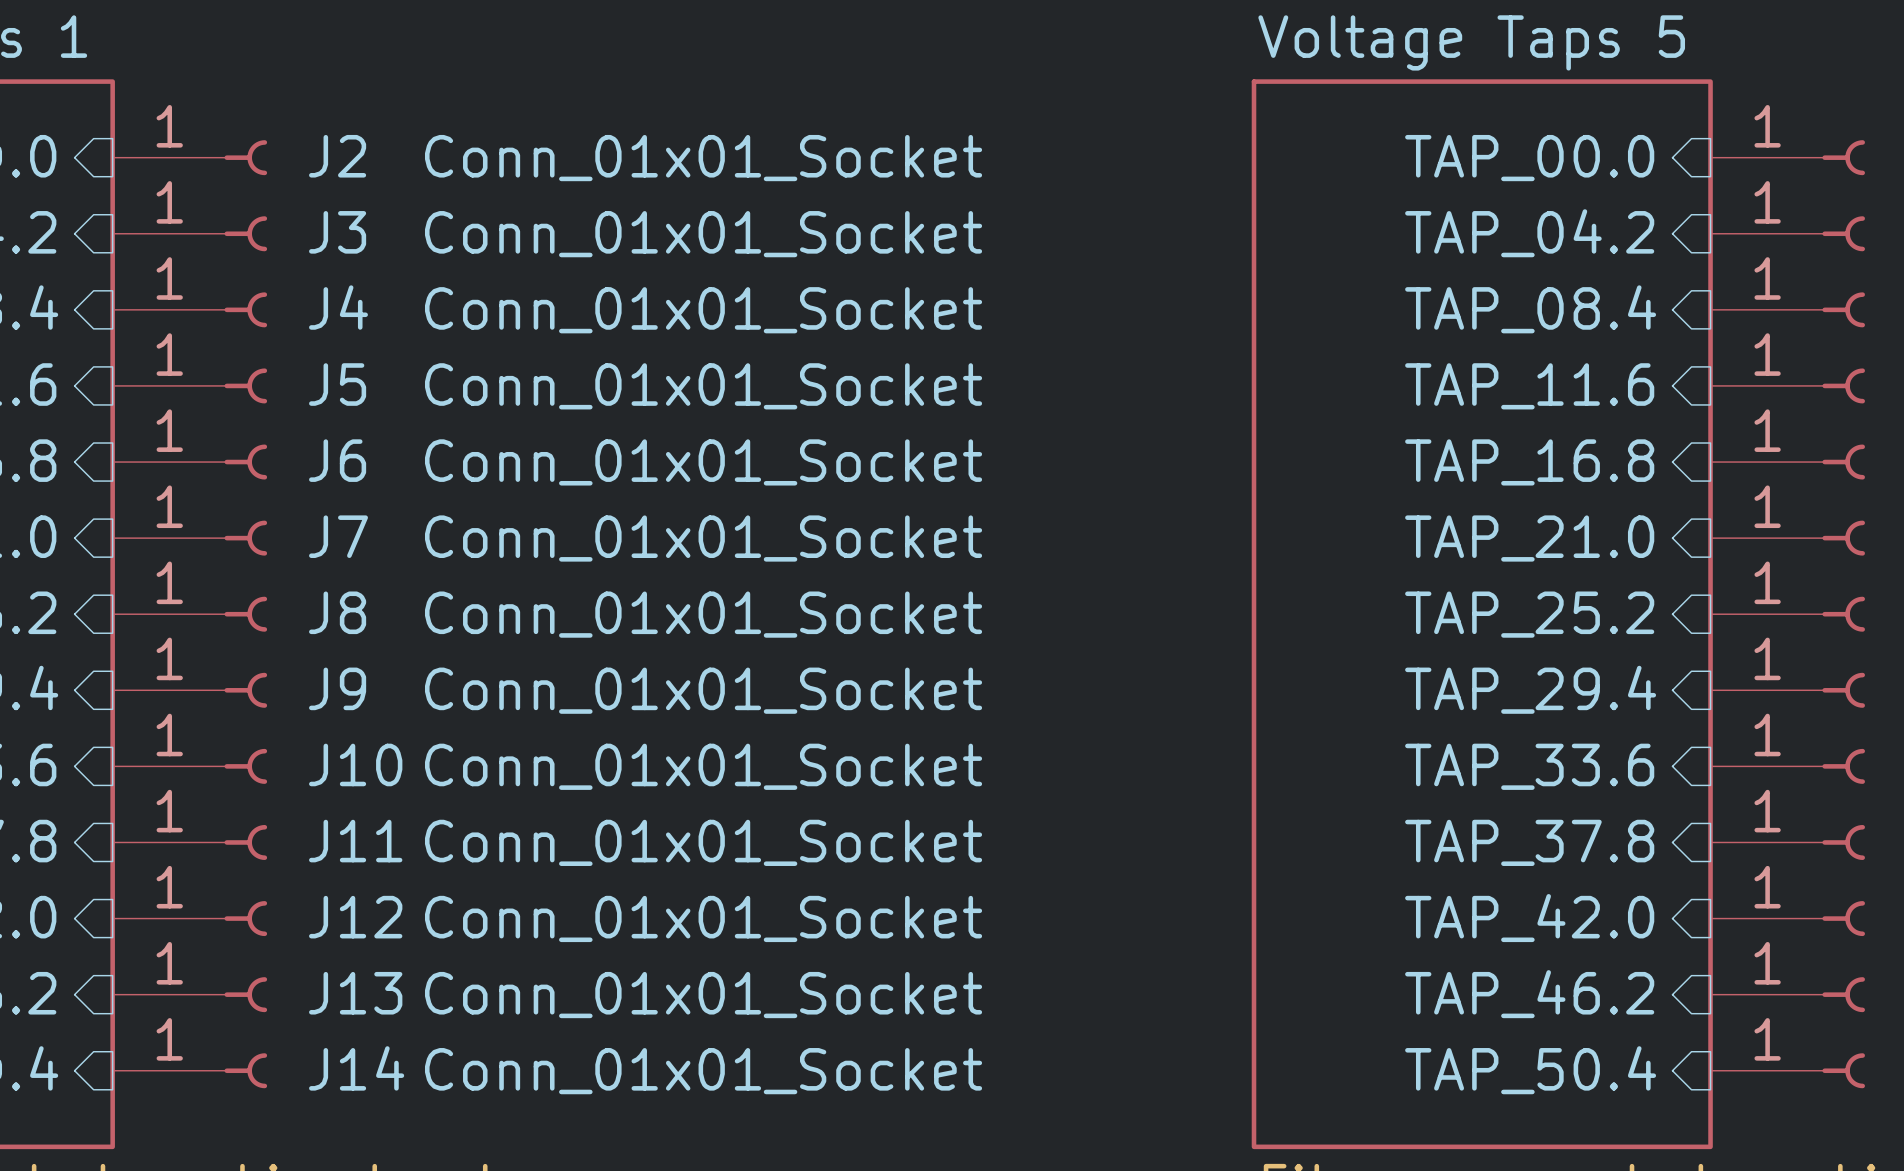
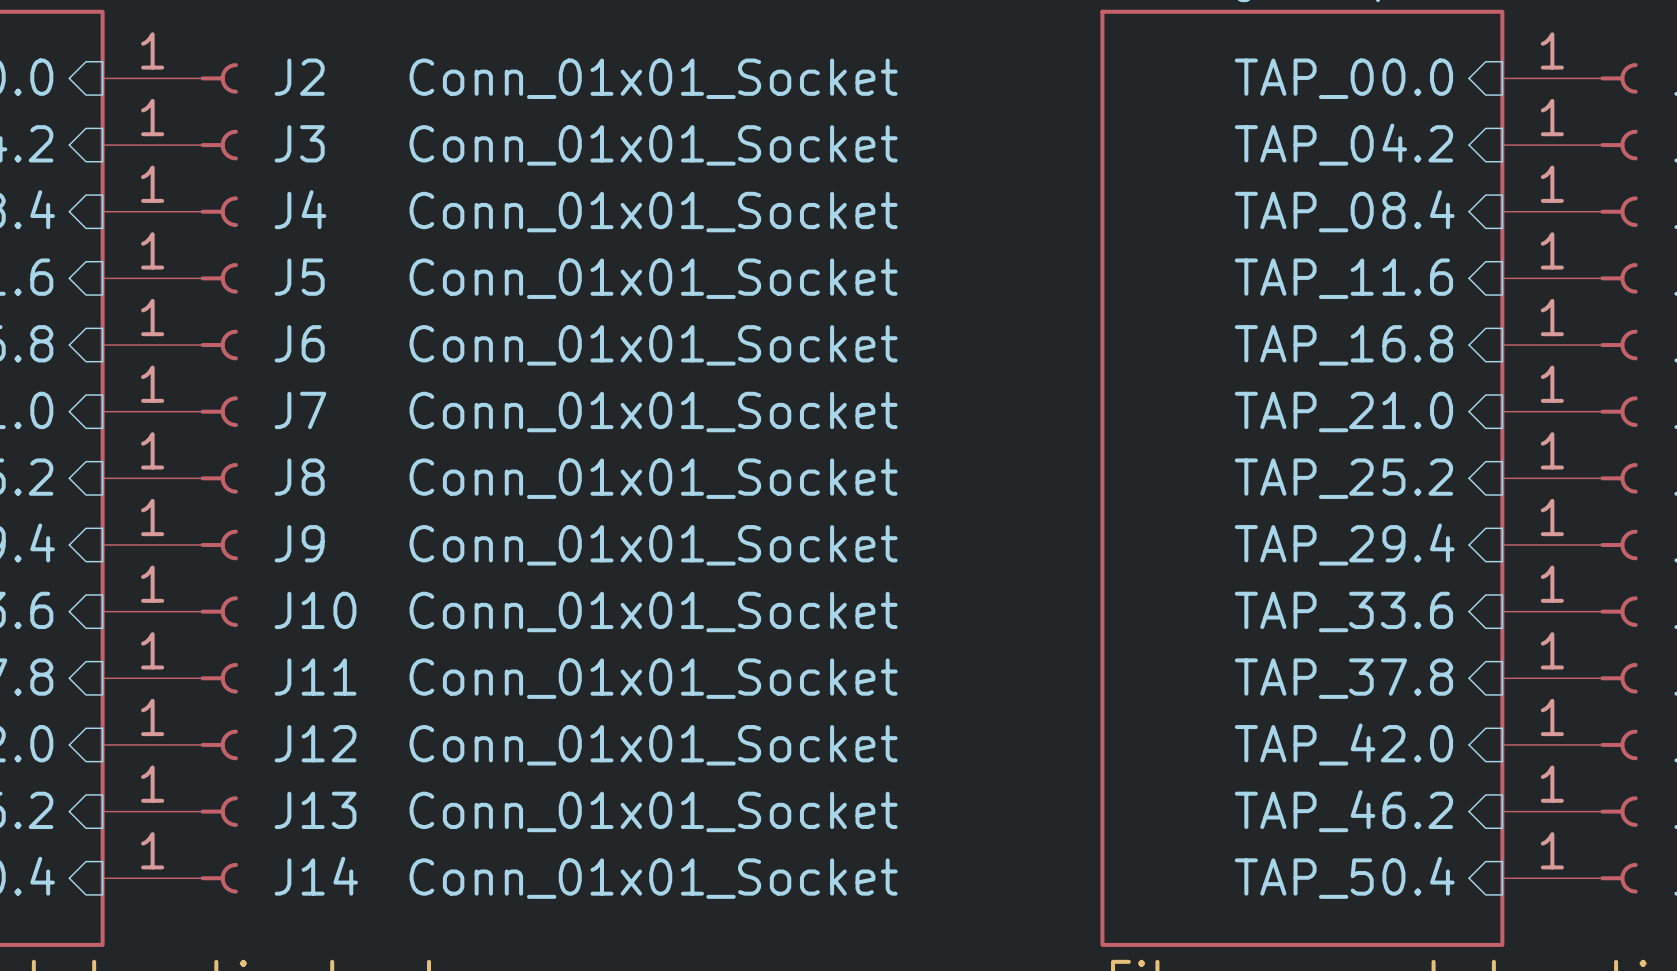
J2 value position: Conn_01x01_Socket (703, 158) -> Conn_01x01_Socket (653, 78)
J3 value position: Conn_01x01_Socket (703, 234) -> Conn_01x01_Socket (653, 145)
J4 value position: Conn_01x01_Socket (703, 310) -> Conn_01x01_Socket (653, 212)
J5 value position: Conn_01x01_Socket (703, 386) -> Conn_01x01_Socket (653, 278)
J6 value position: Conn_01x01_Socket (703, 462) -> Conn_01x01_Socket (653, 345)
J7 value position: Conn_01x01_Socket (703, 538) -> Conn_01x01_Socket (653, 412)
J8 value position: Conn_01x01_Socket (703, 614) -> Conn_01x01_Socket (653, 478)
J9 value position: Conn_01x01_Socket (703, 690) -> Conn_01x01_Socket (653, 545)
J10 value position: Conn_01x01_Socket (703, 766) -> Conn_01x01_Socket (653, 611)
J11 value position: Conn_01x01_Socket (703, 842) -> Conn_01x01_Socket (653, 678)
J12 value position: Conn_01x01_Socket (703, 918) -> Conn_01x01_Socket (653, 745)
J13 value position: Conn_01x01_Socket (703, 995) -> Conn_01x01_Socket (653, 811)
J14 value position: Conn_01x01_Socket (703, 1071) -> Conn_01x01_Socket (653, 878)

